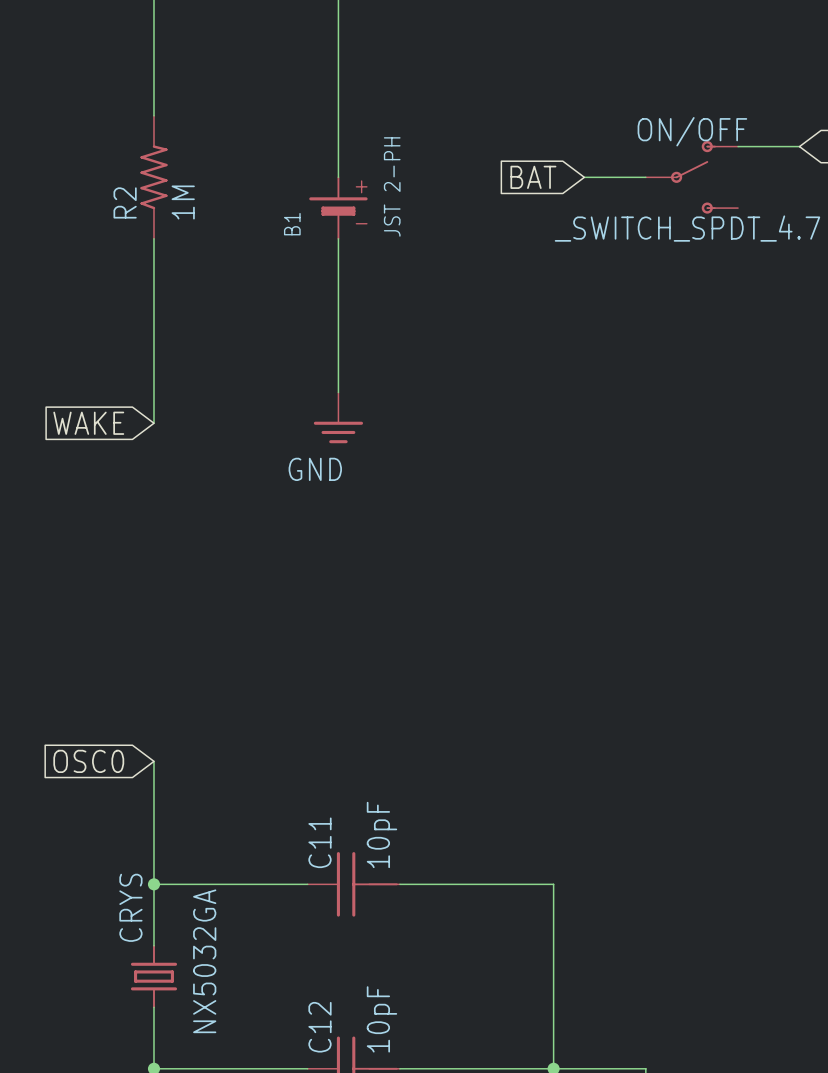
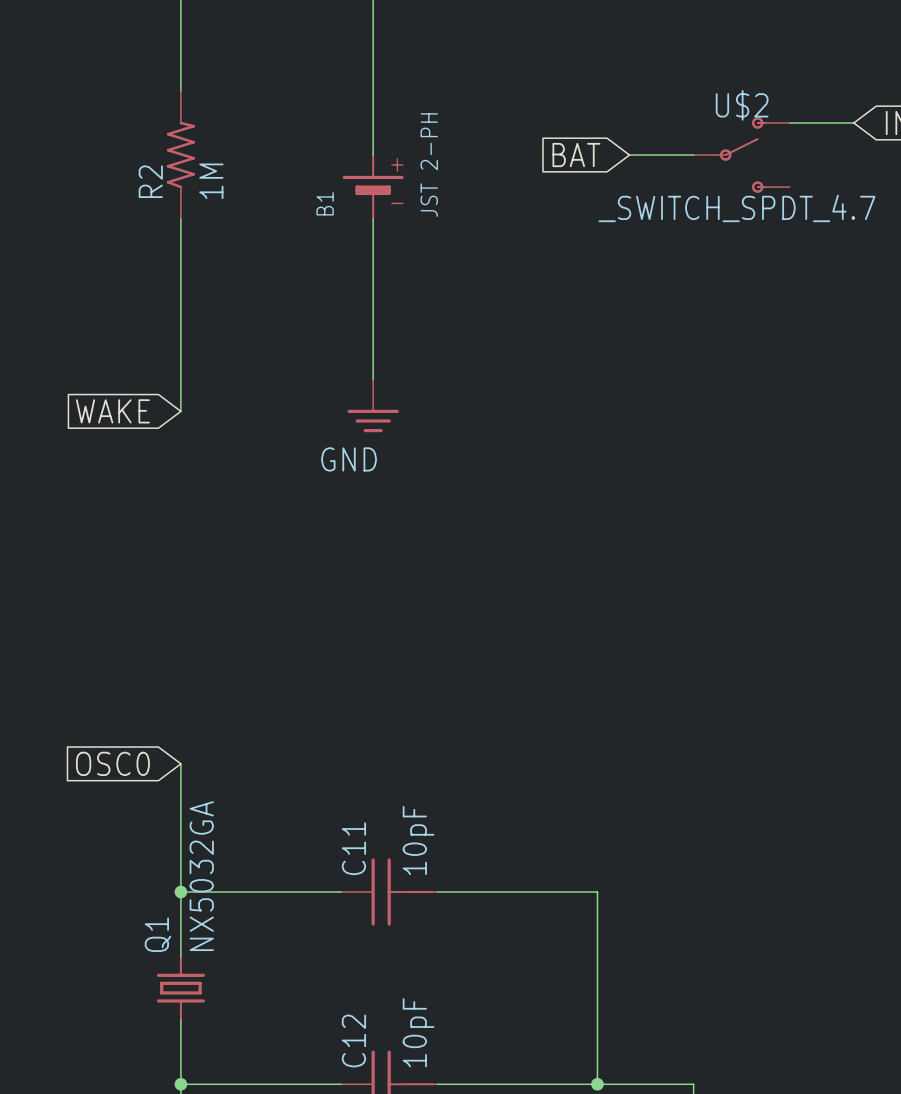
ON/OFF name: ON/OFF (692, 131) -> U$2 (742, 105)
CRYS name: CRYS (130, 907) -> Q1 (157, 934)
CRYS value position: NX5032GA (204, 961) -> NX5032GA (201, 876)

